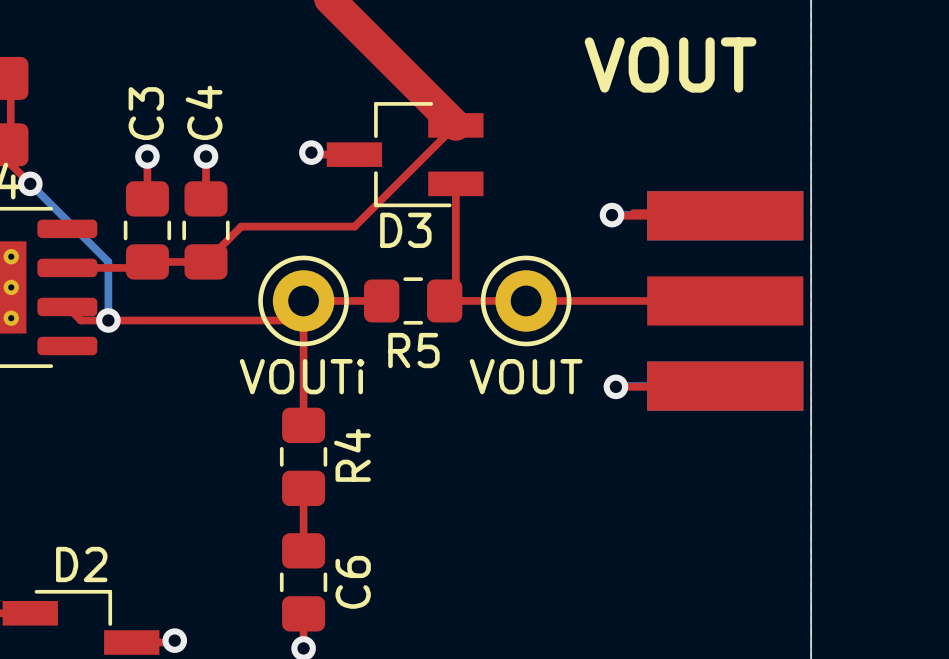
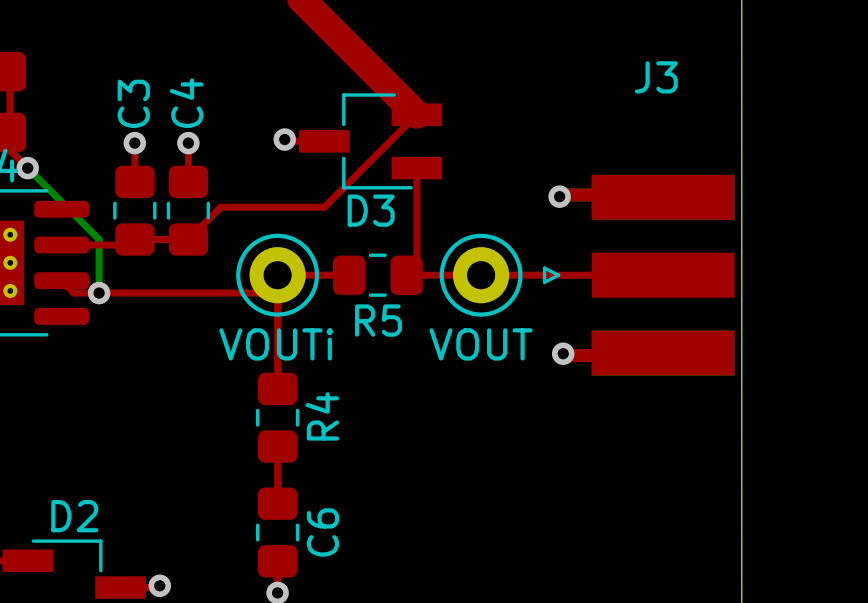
text: VOUT (670, 64) -> none
J3: none -> (638, 275)
part: (725, 300) -> none

